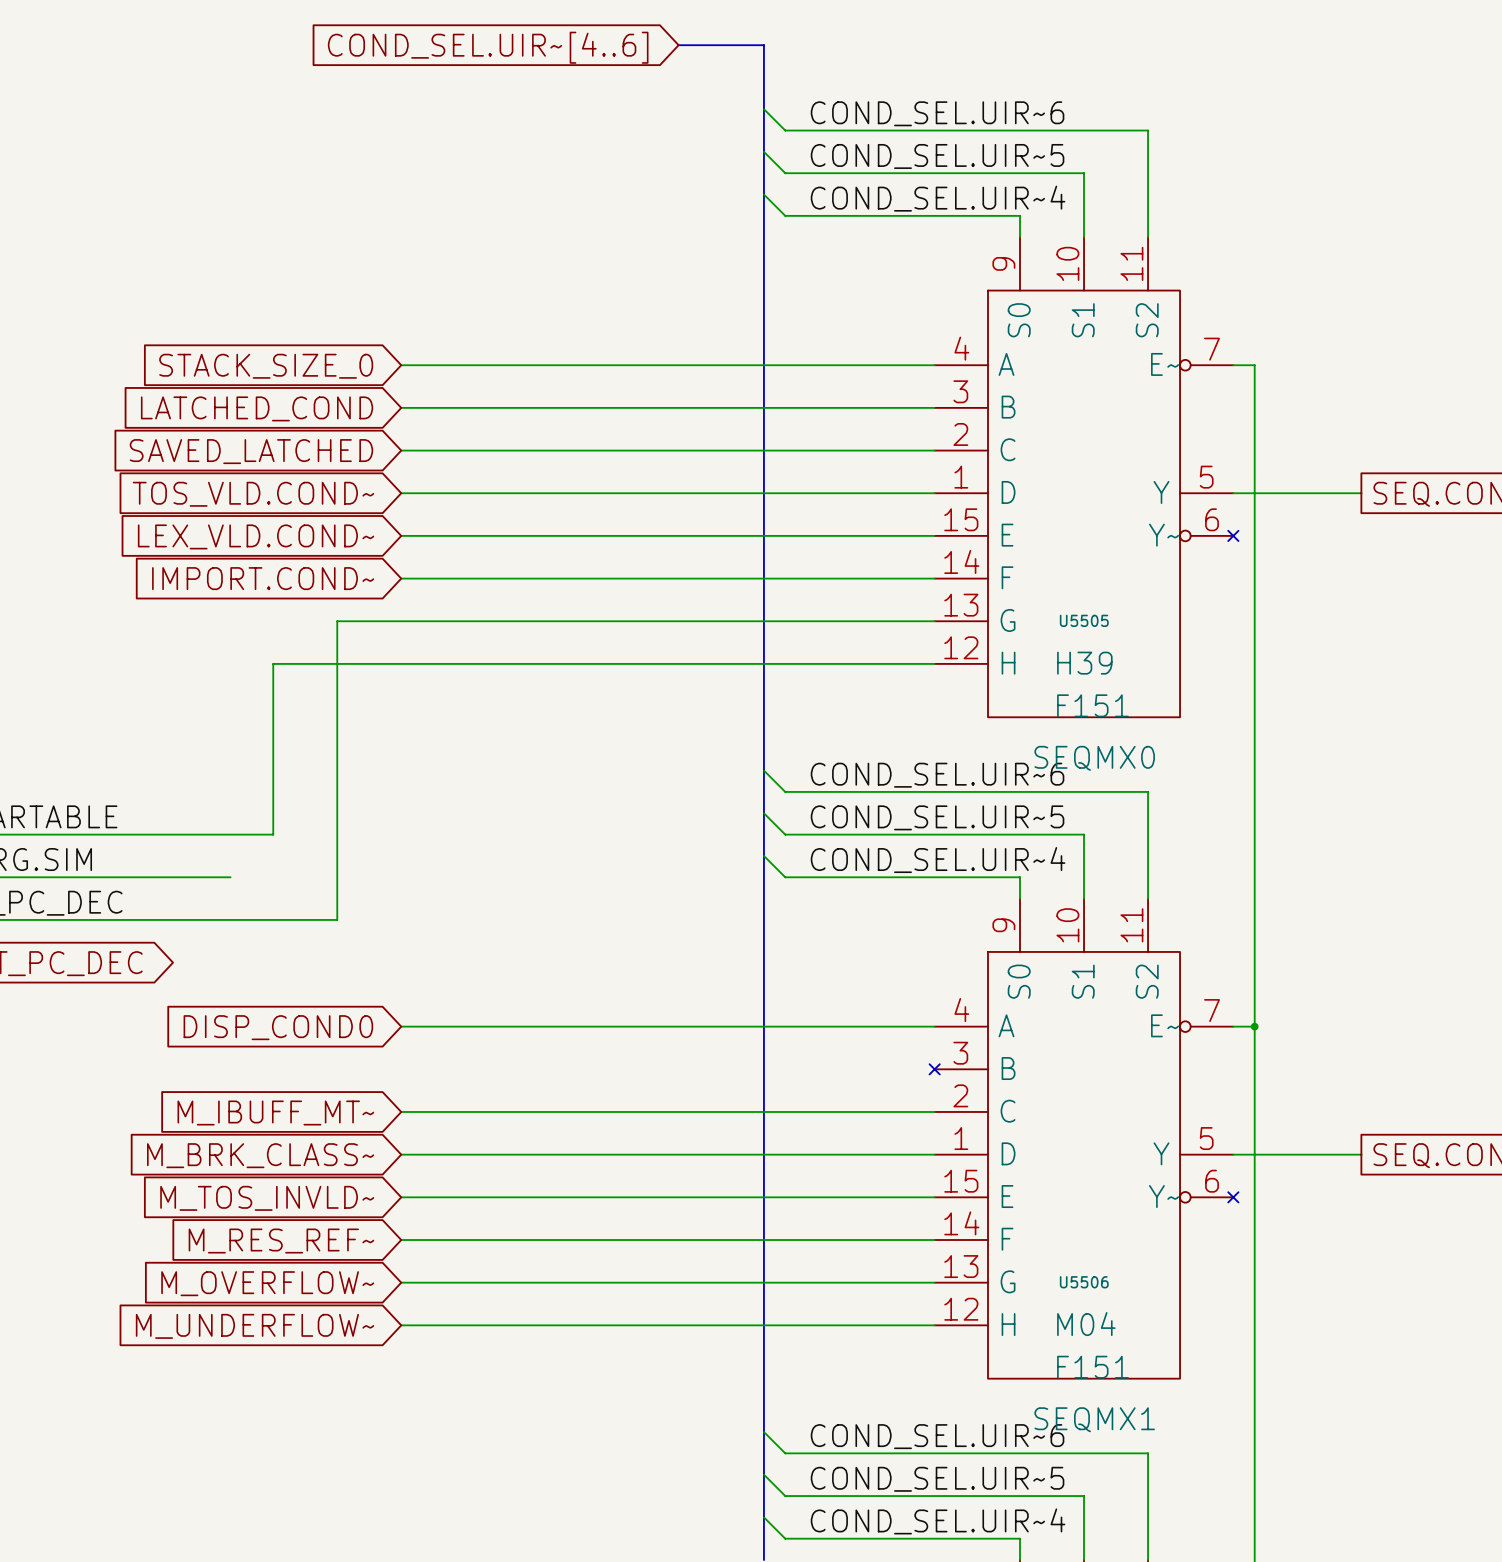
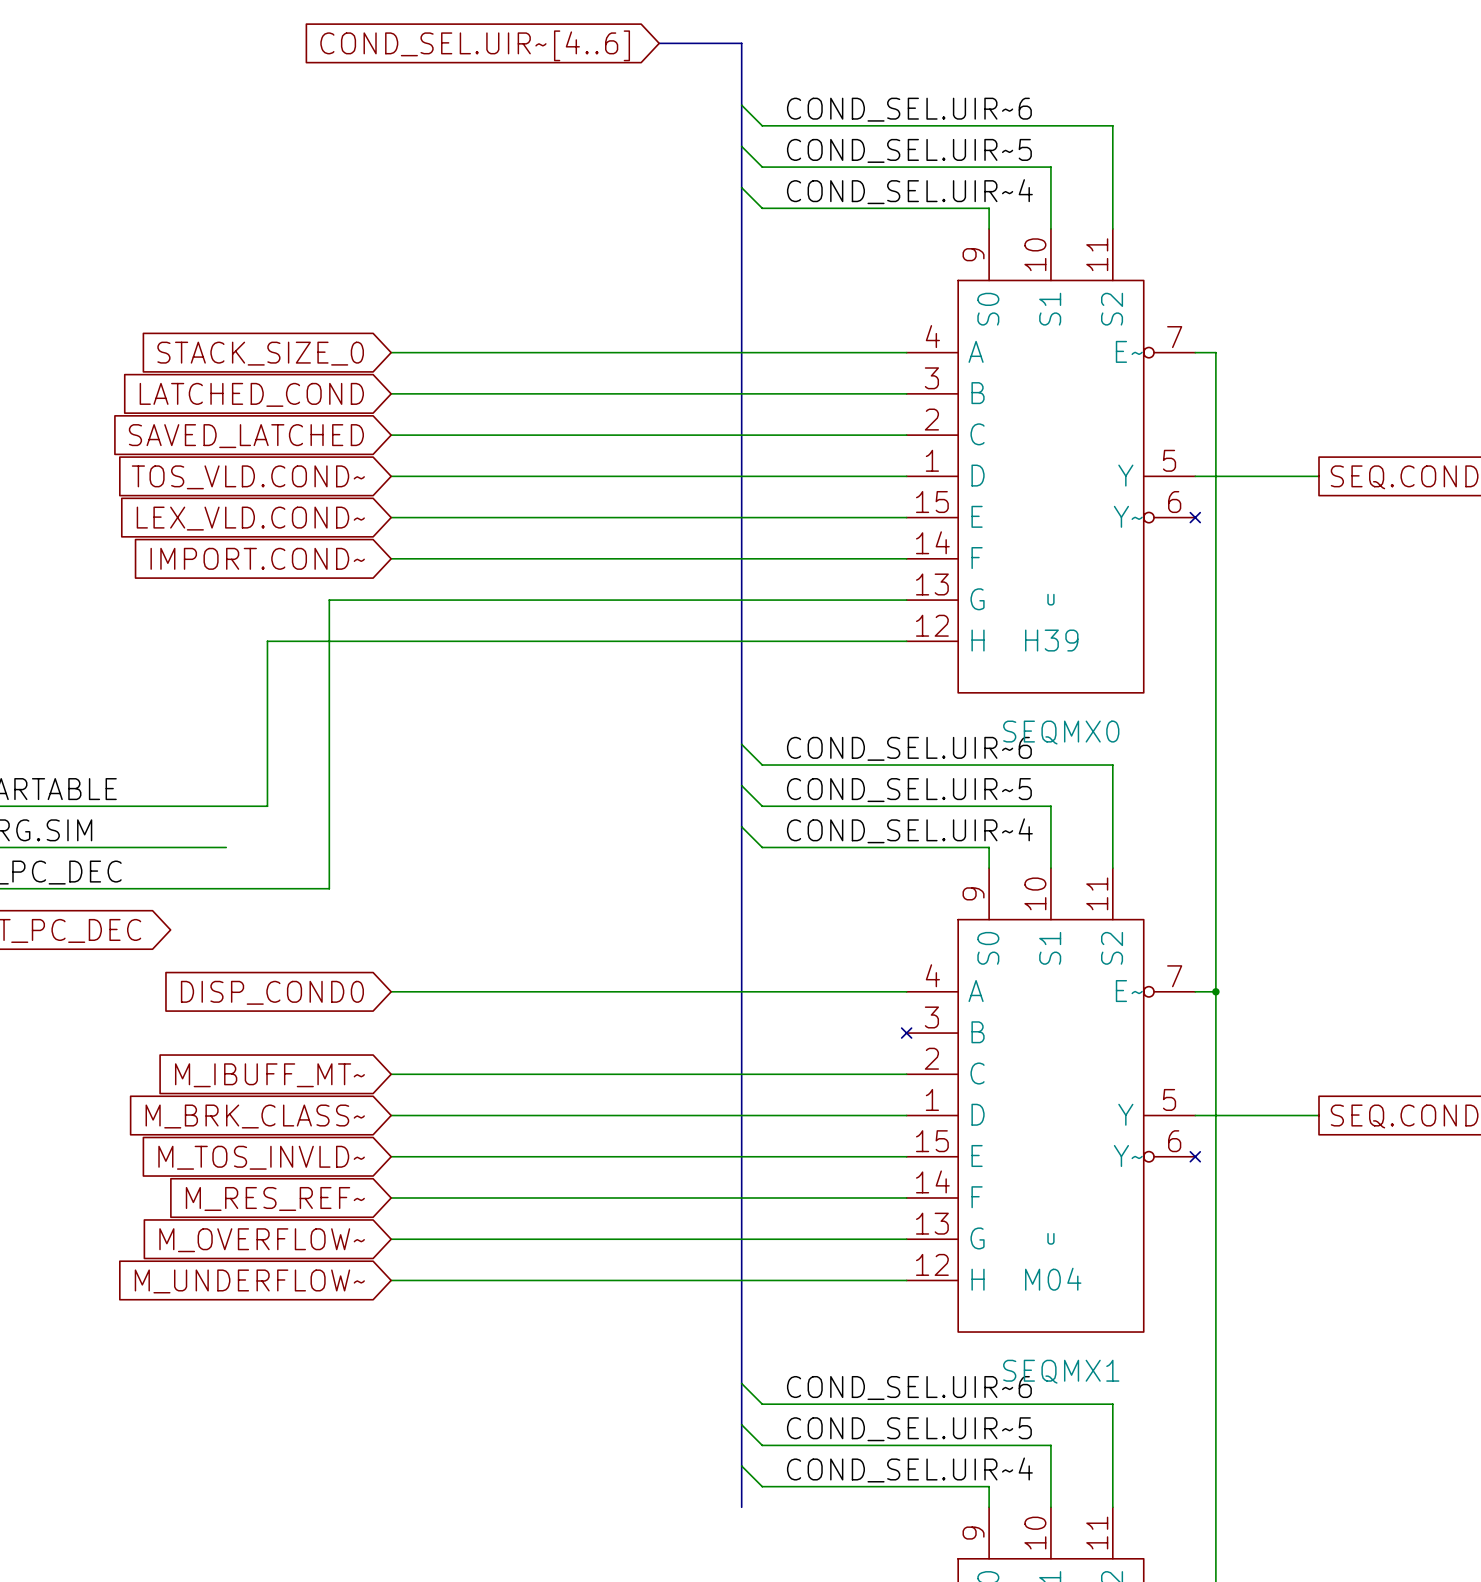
U5505 name: U5505 (1084, 620) -> U (1050, 599)
U5505 value: F151 (1092, 705) -> none
U5506 name: U5506 (1084, 1282) -> U (1050, 1238)
U5506 value: F151 (1092, 1367) -> none

